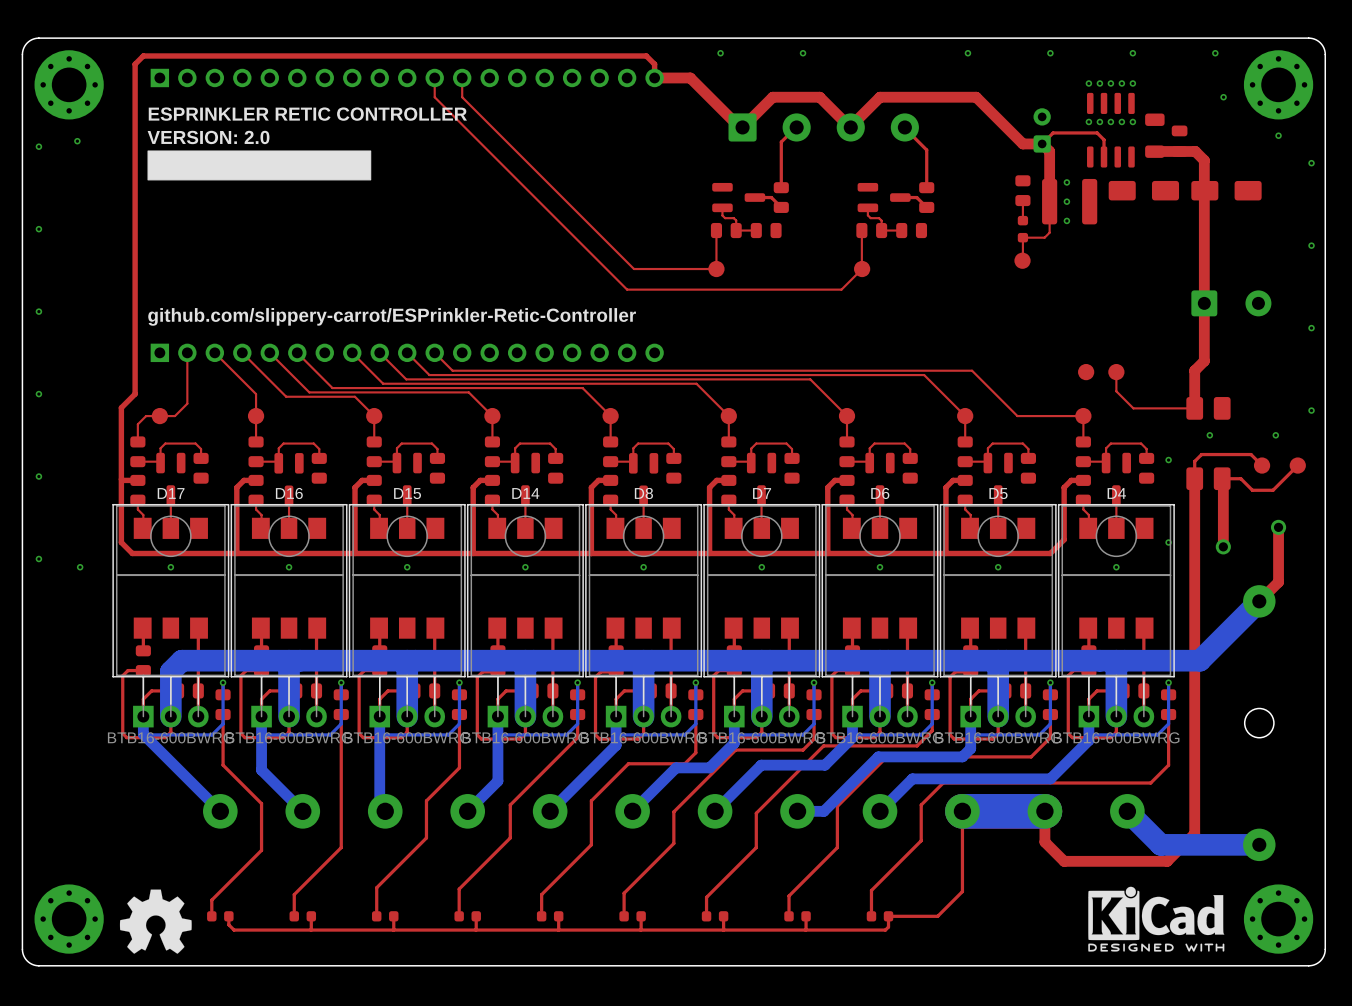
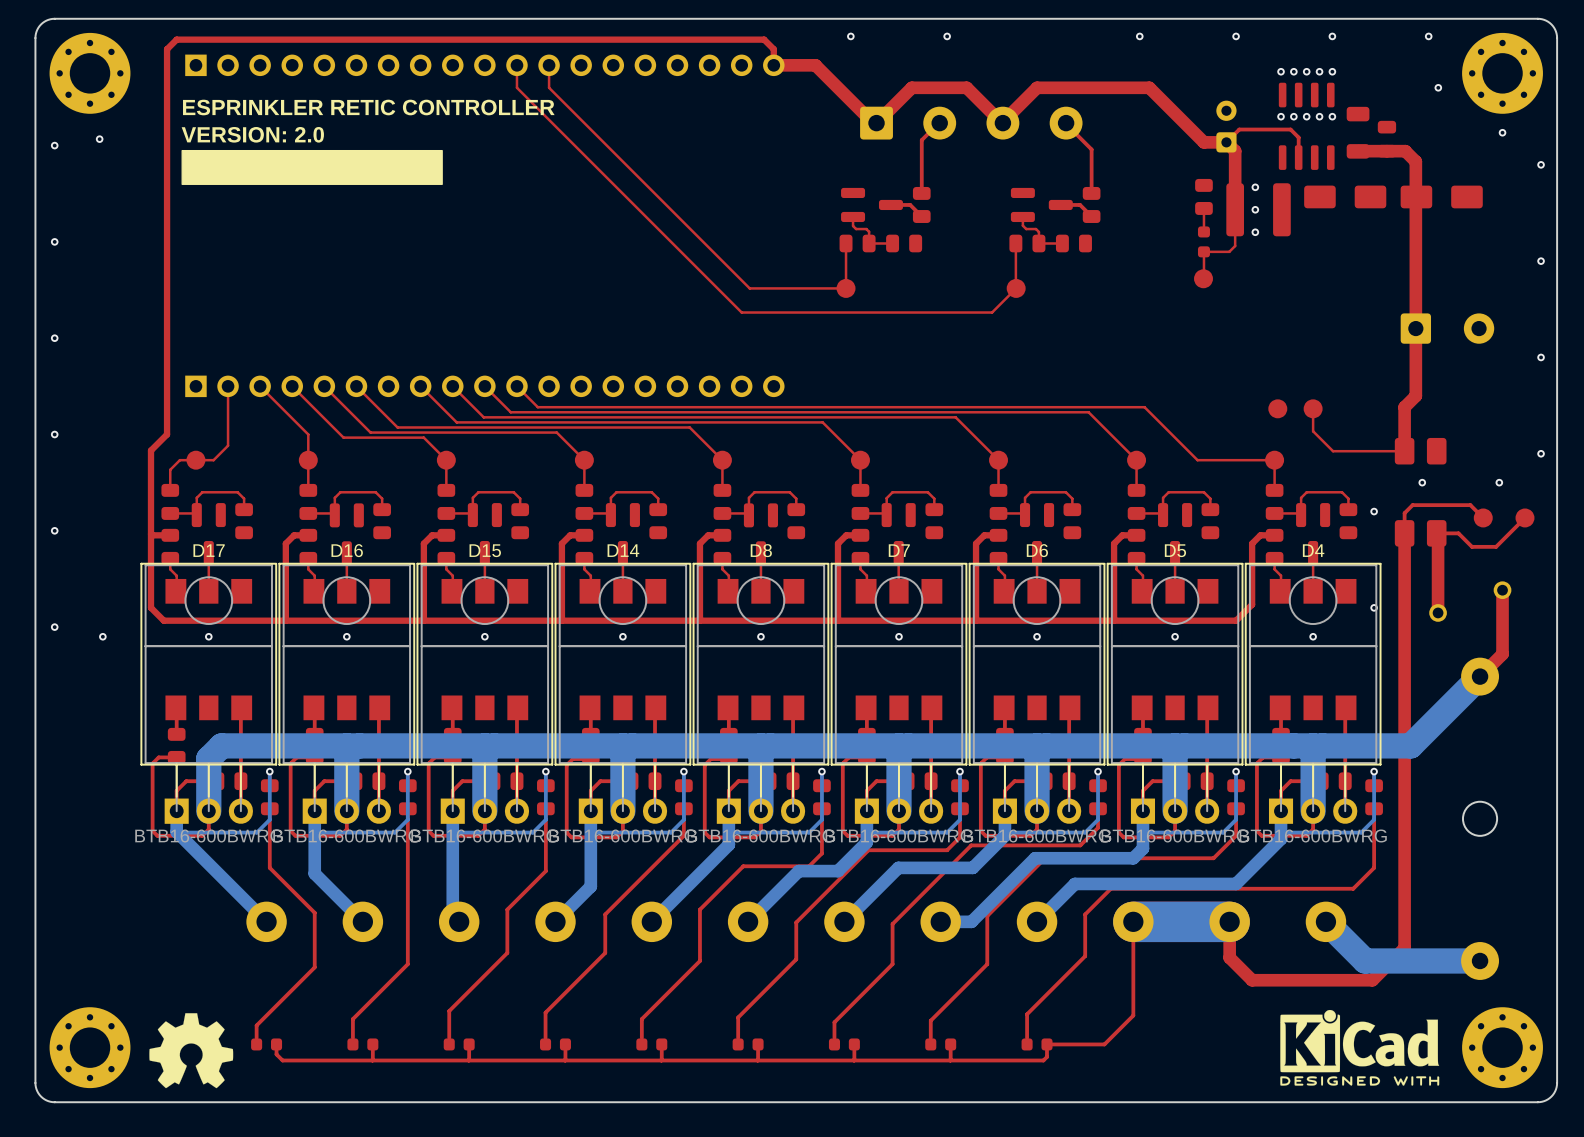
text: github.com/slippery-carrot/ESPrinkler-Retic-Controller (392, 316) -> none

